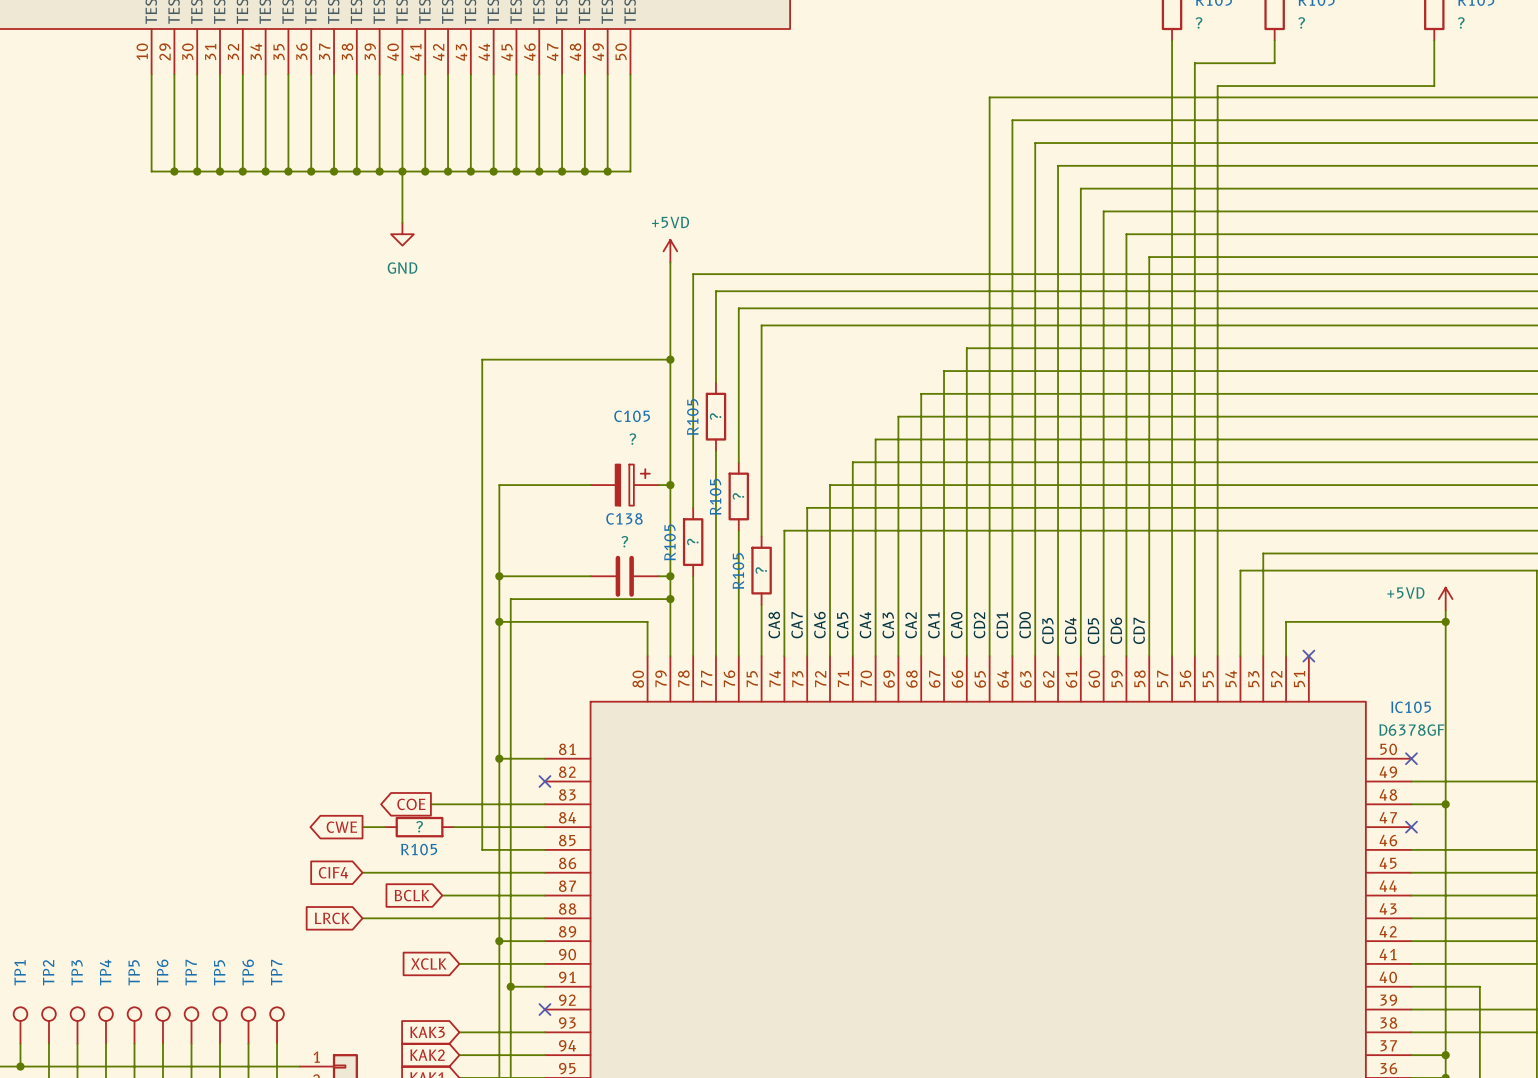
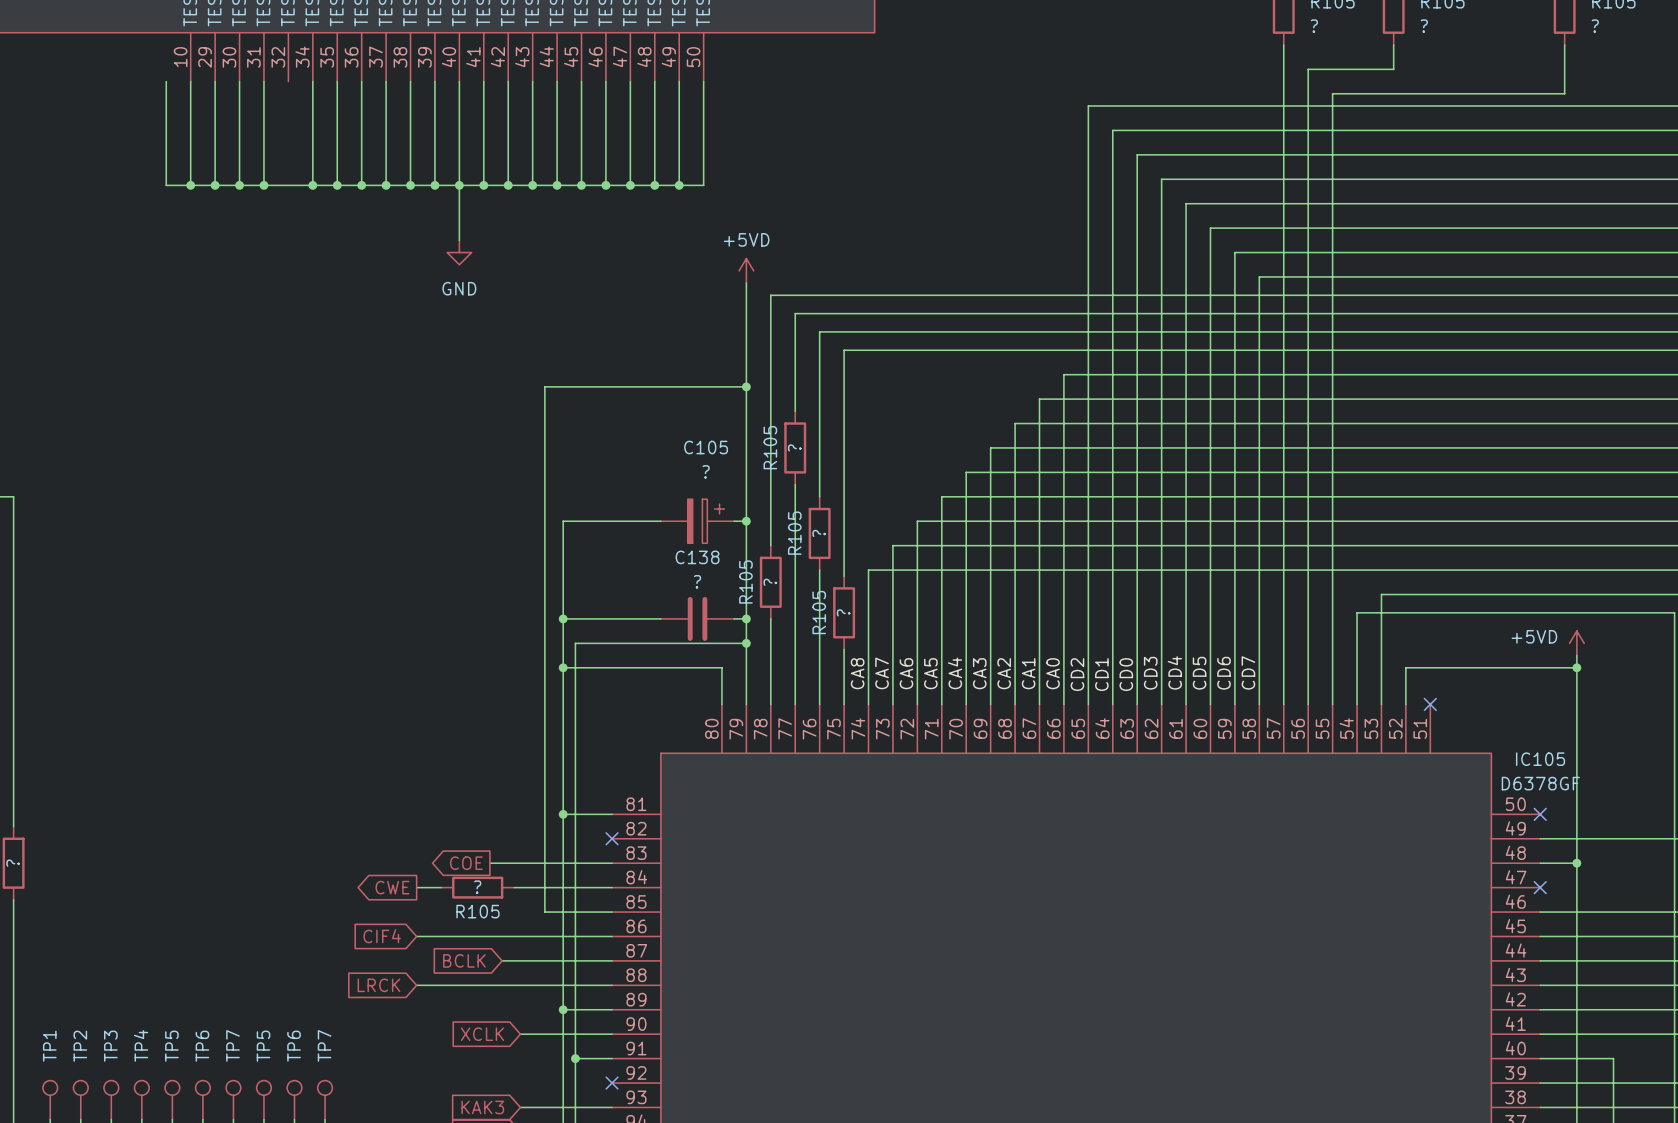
wire: none -> (166, 81) (166, 185) (190, 185)
wire: (242, 74) (242, 171) -> none
junction: none -> (190, 185)
junction: (242, 171) -> none

